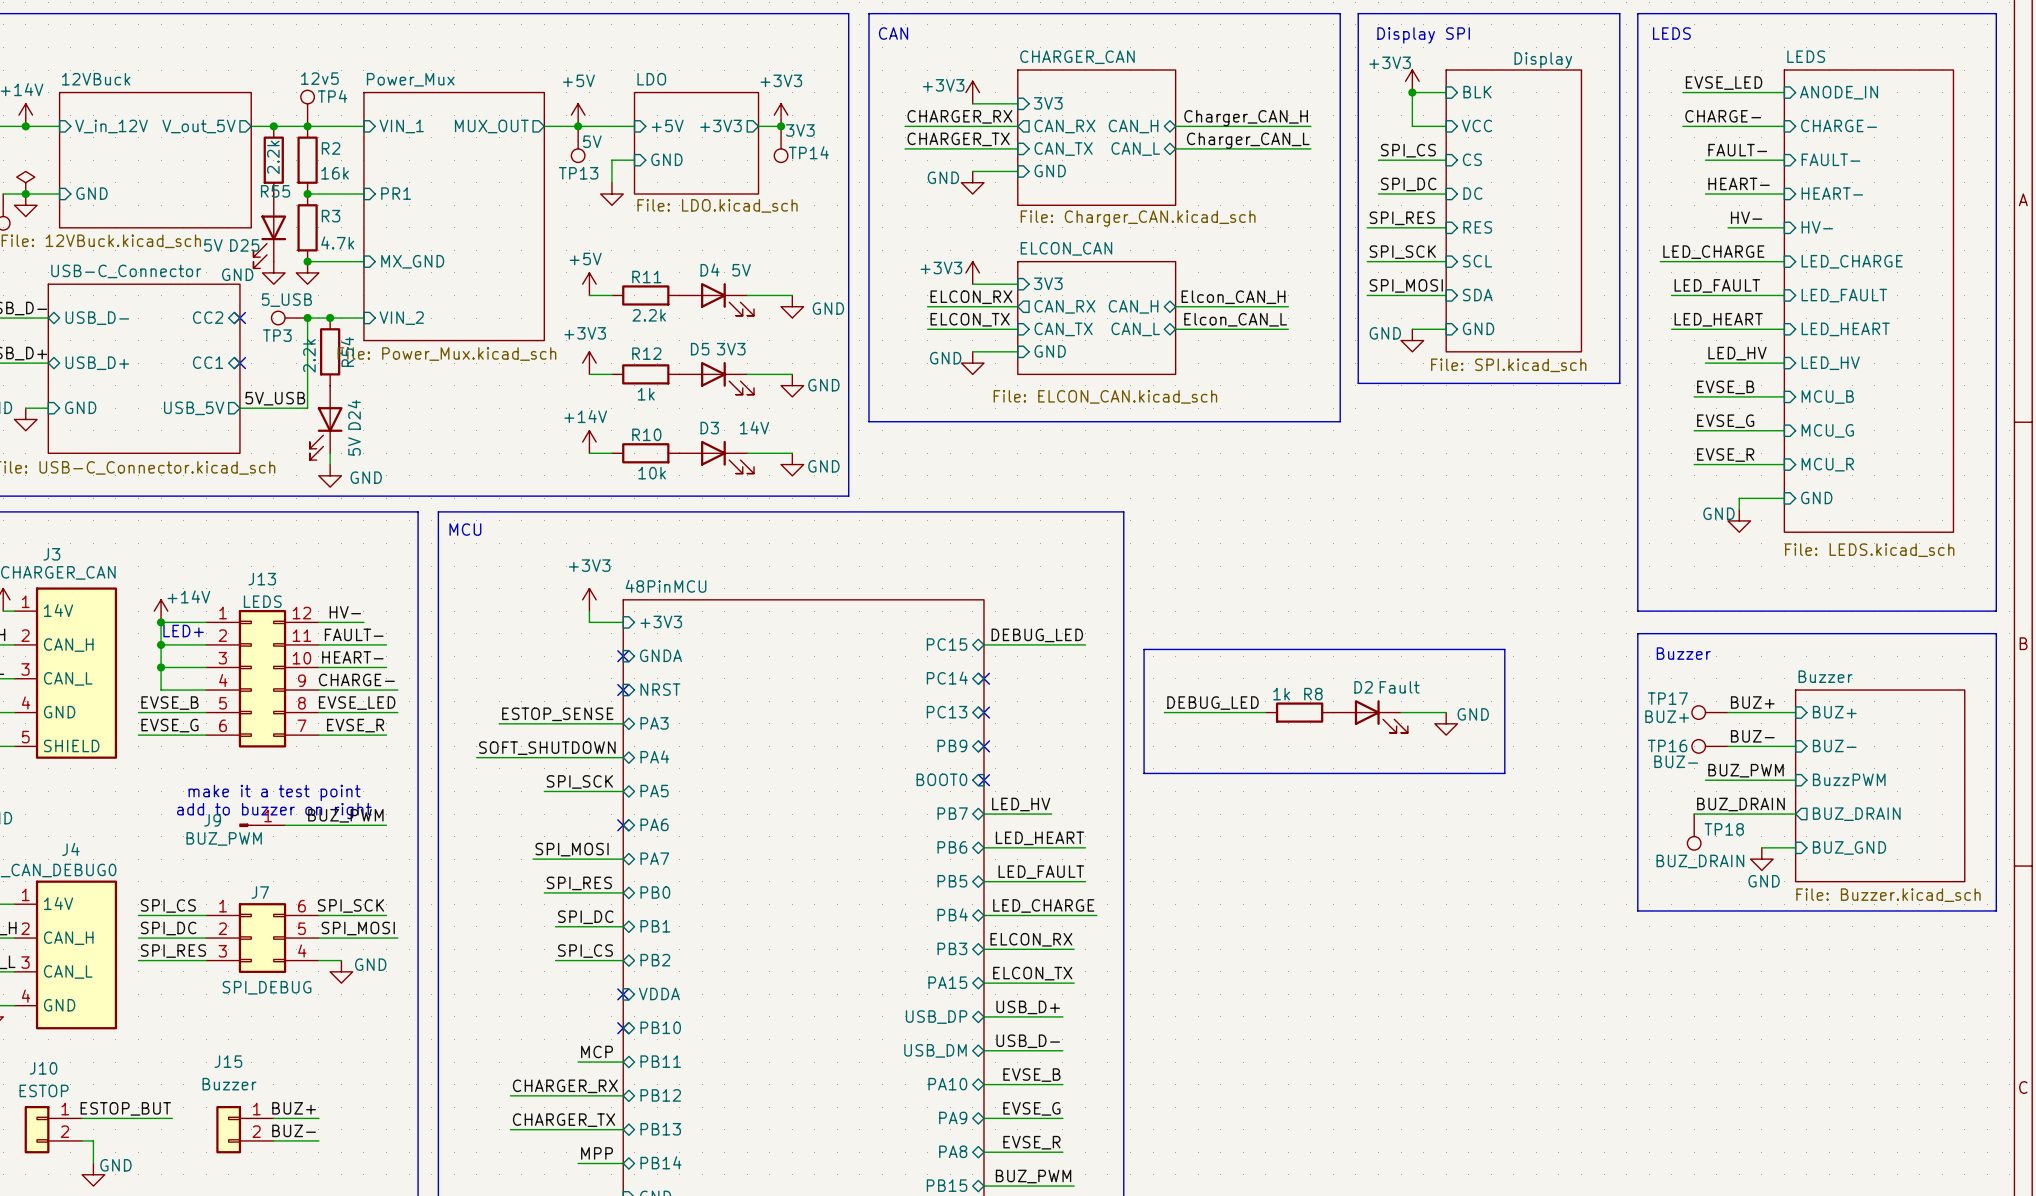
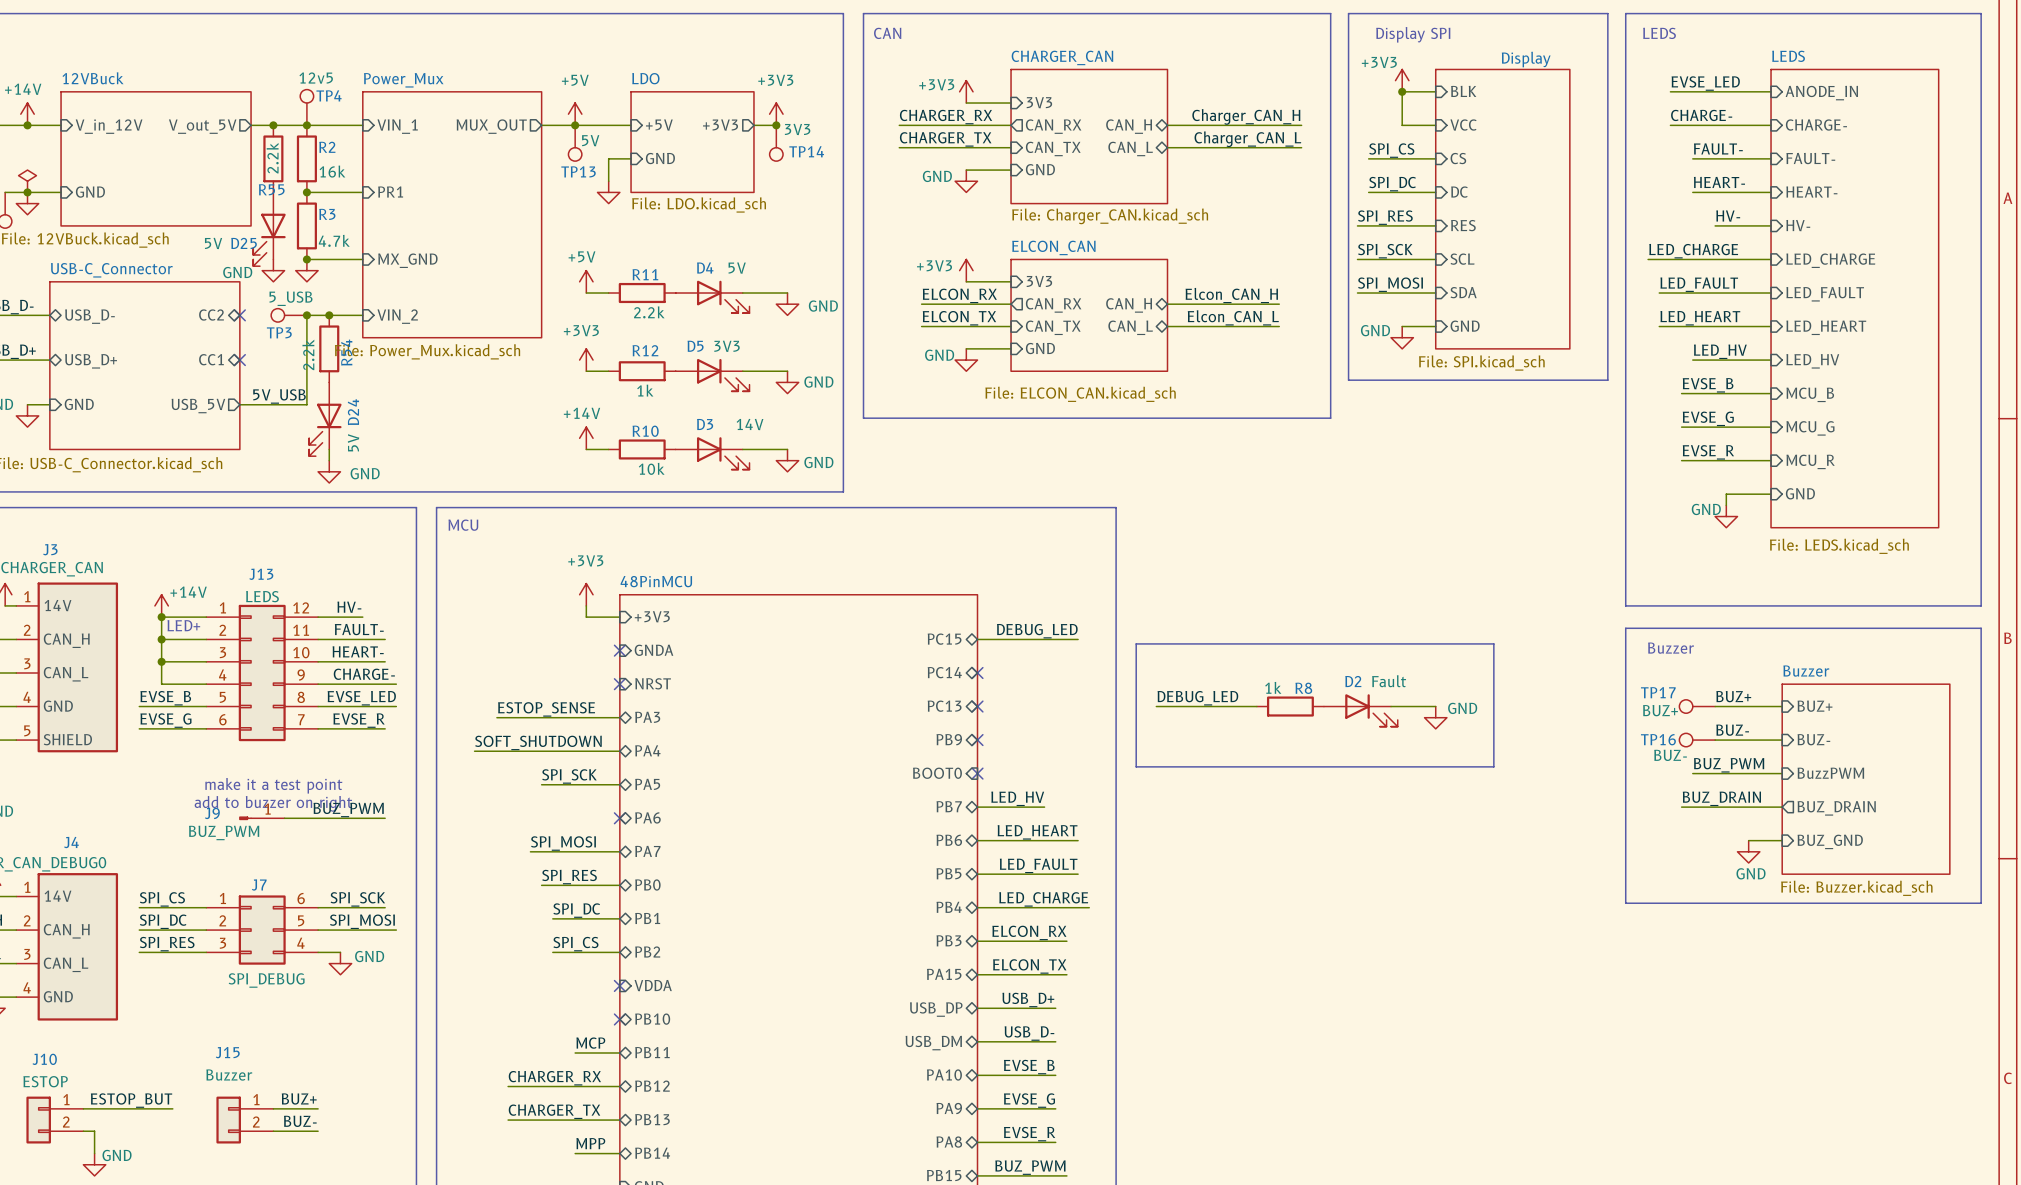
TP18: BUZ_DRAIN (1694, 832) -> none

